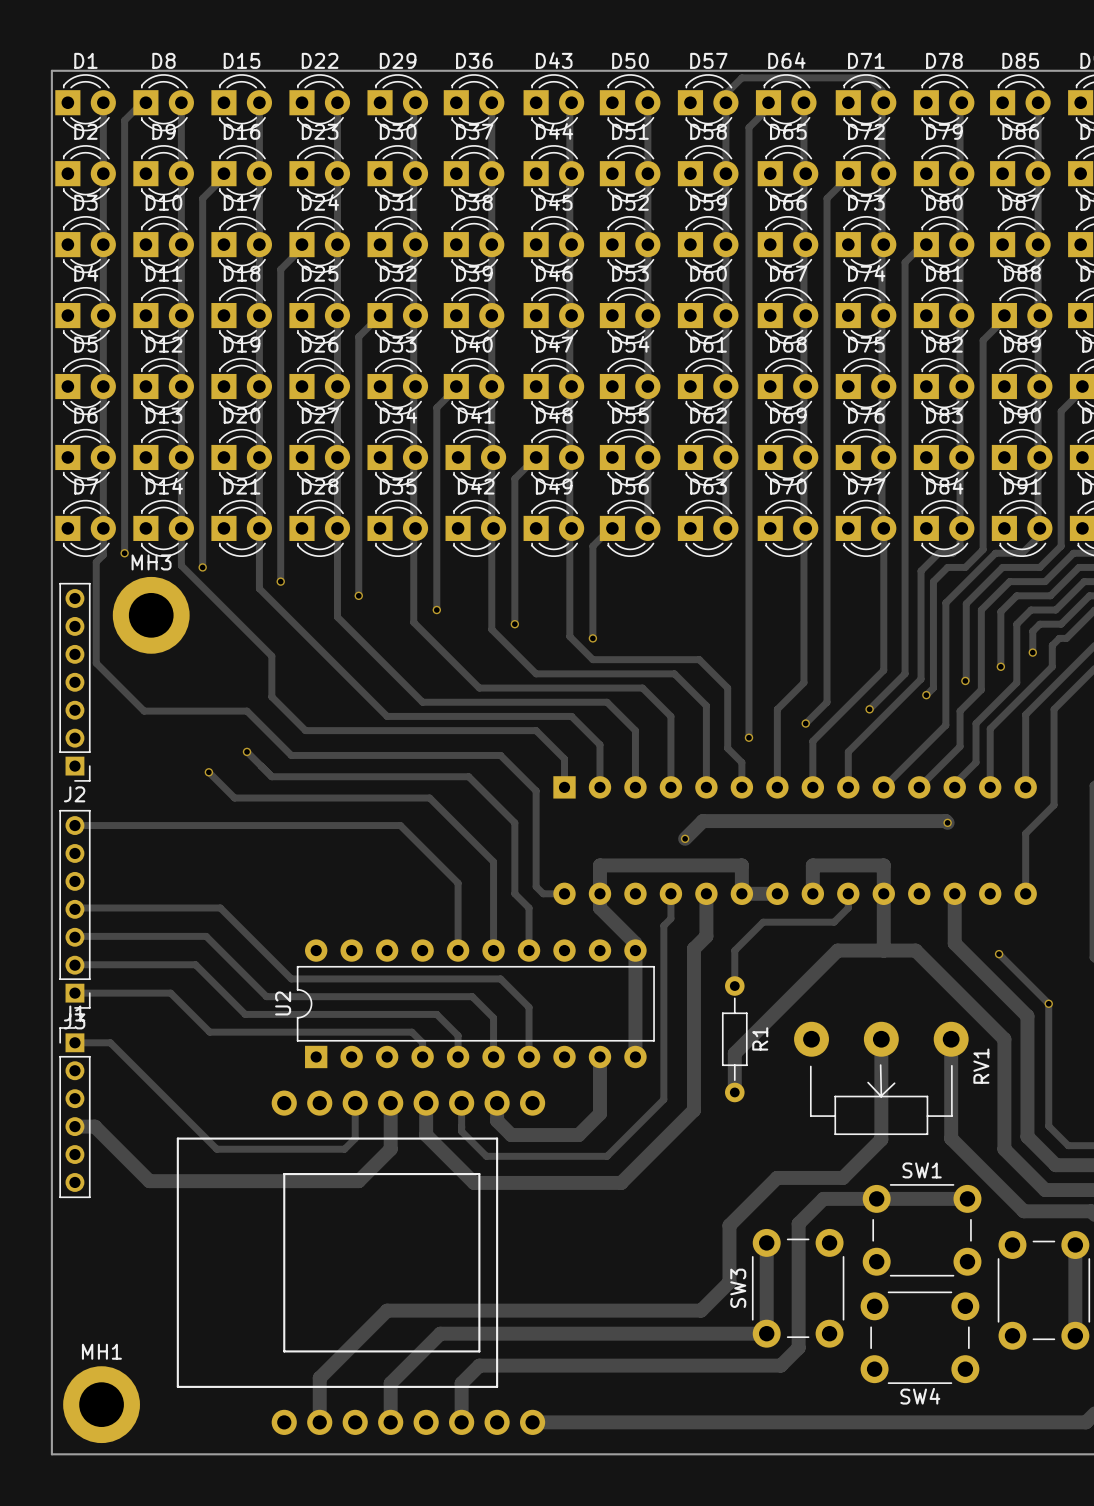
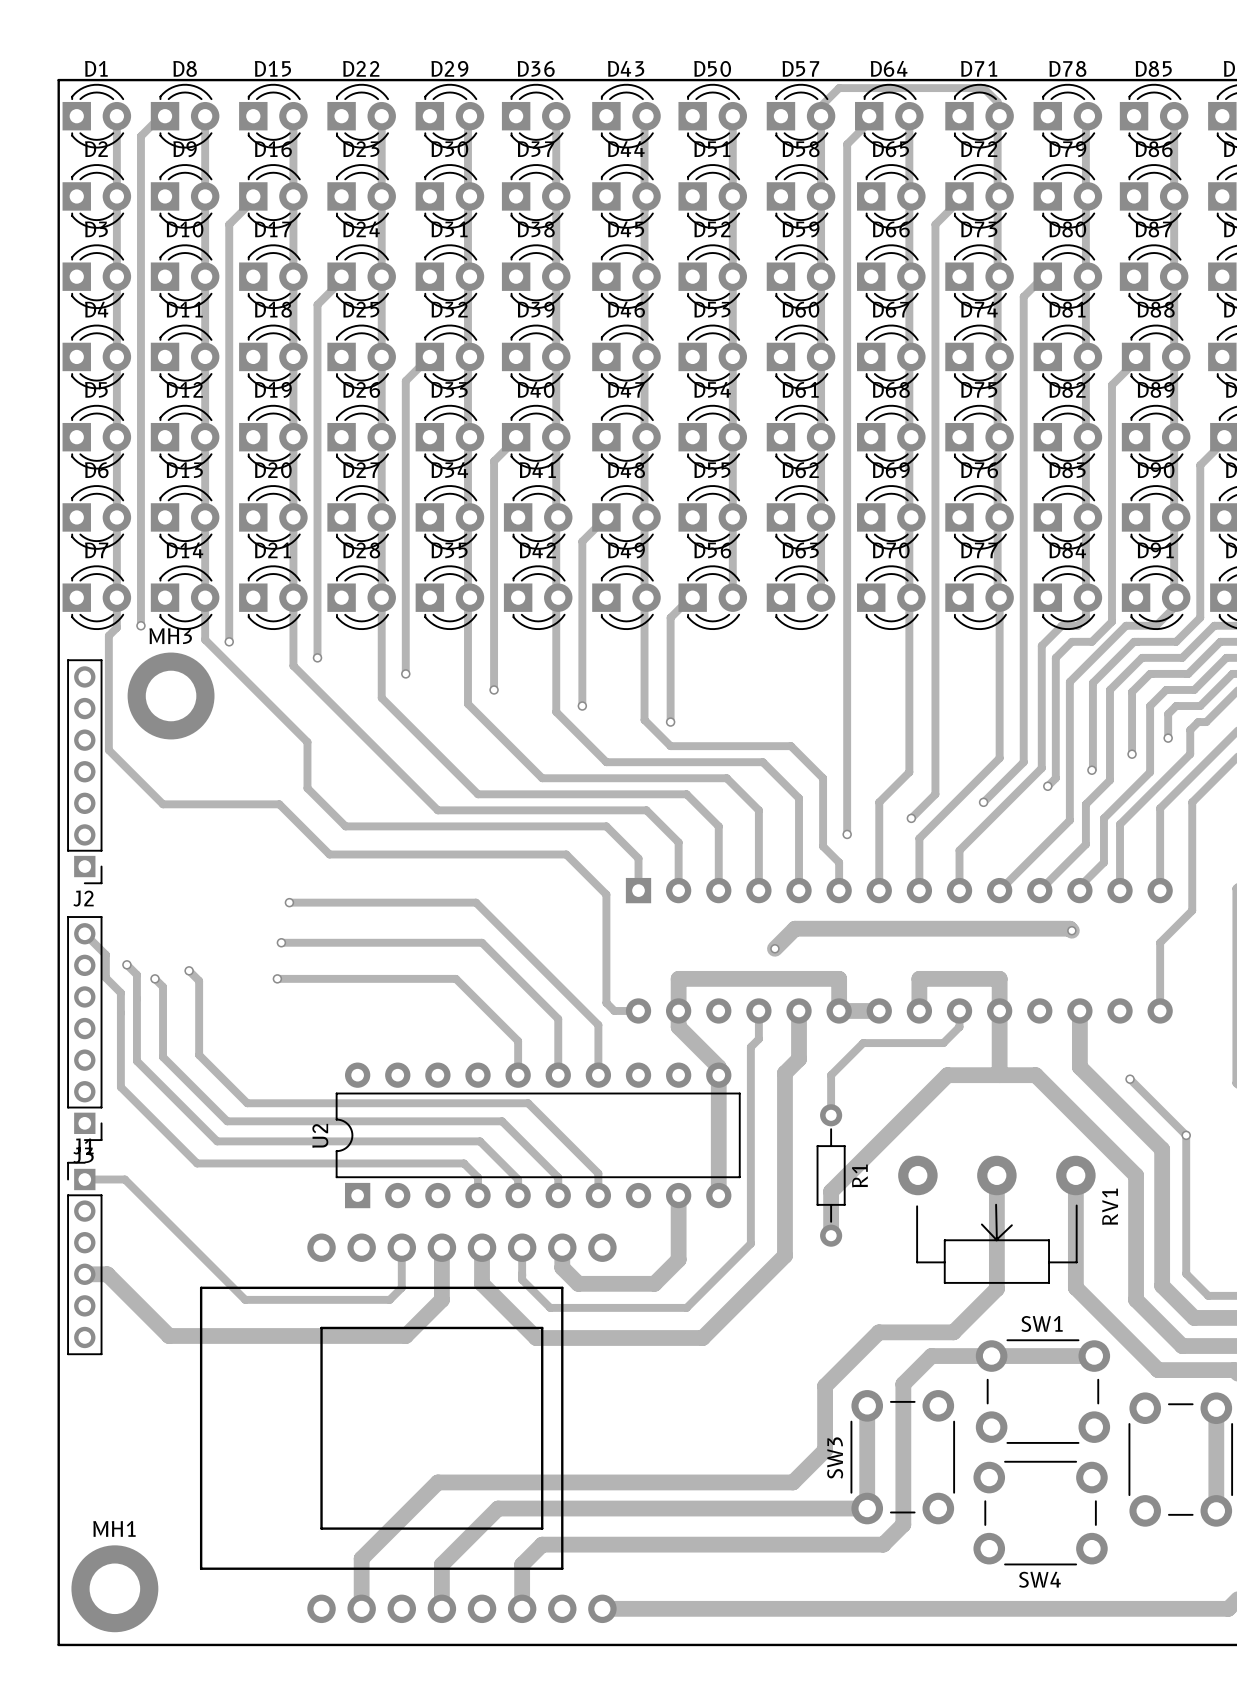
track: (247, 751) (271, 776) (468, 776) (514, 822) (514, 893) (529, 907) -> none
via: (247, 751) -> none
track: (208, 772) (234, 798) (255, 798) -> none
via: (208, 772) -> none
via: none -> (289, 902)
track: (420, 798) (429, 798) (493, 861) (493, 900) -> (476, 902) (598, 1027)
track: (79, 825) (400, 825) (458, 883) (458, 920) -> (277, 978) (455, 978) (518, 1041)
track: none -> (281, 942) (482, 942) (558, 1019)
via: none -> (281, 942)
via: none -> (126, 964)
via: none -> (189, 970)
via: none -> (155, 978)
via: none -> (277, 978)
track: (76, 907) (220, 907) (291, 978) (500, 978) (529, 1007) (529, 1037) -> (189, 970) (199, 980) (199, 1055) (247, 1103) (528, 1103) (598, 1173)
track: (75, 936) (206, 936) (266, 996) (472, 996) (493, 1017) (493, 1041) -> (155, 978) (163, 986) (163, 1057) (227, 1121) (502, 1121) (558, 1177)
track: (75, 964) (195, 964) (245, 1014) (436, 1014) (458, 1035) (458, 1042) -> (126, 964) (136, 974) (136, 1061) (217, 1141) (480, 1141) (518, 1179)
track: (74, 993) (170, 993) (209, 1032) (411, 1032) (422, 1042) -> (84, 933) (105, 954) (105, 977) (120, 992) (120, 1087) (197, 1163) (463, 1163) (478, 1179)

